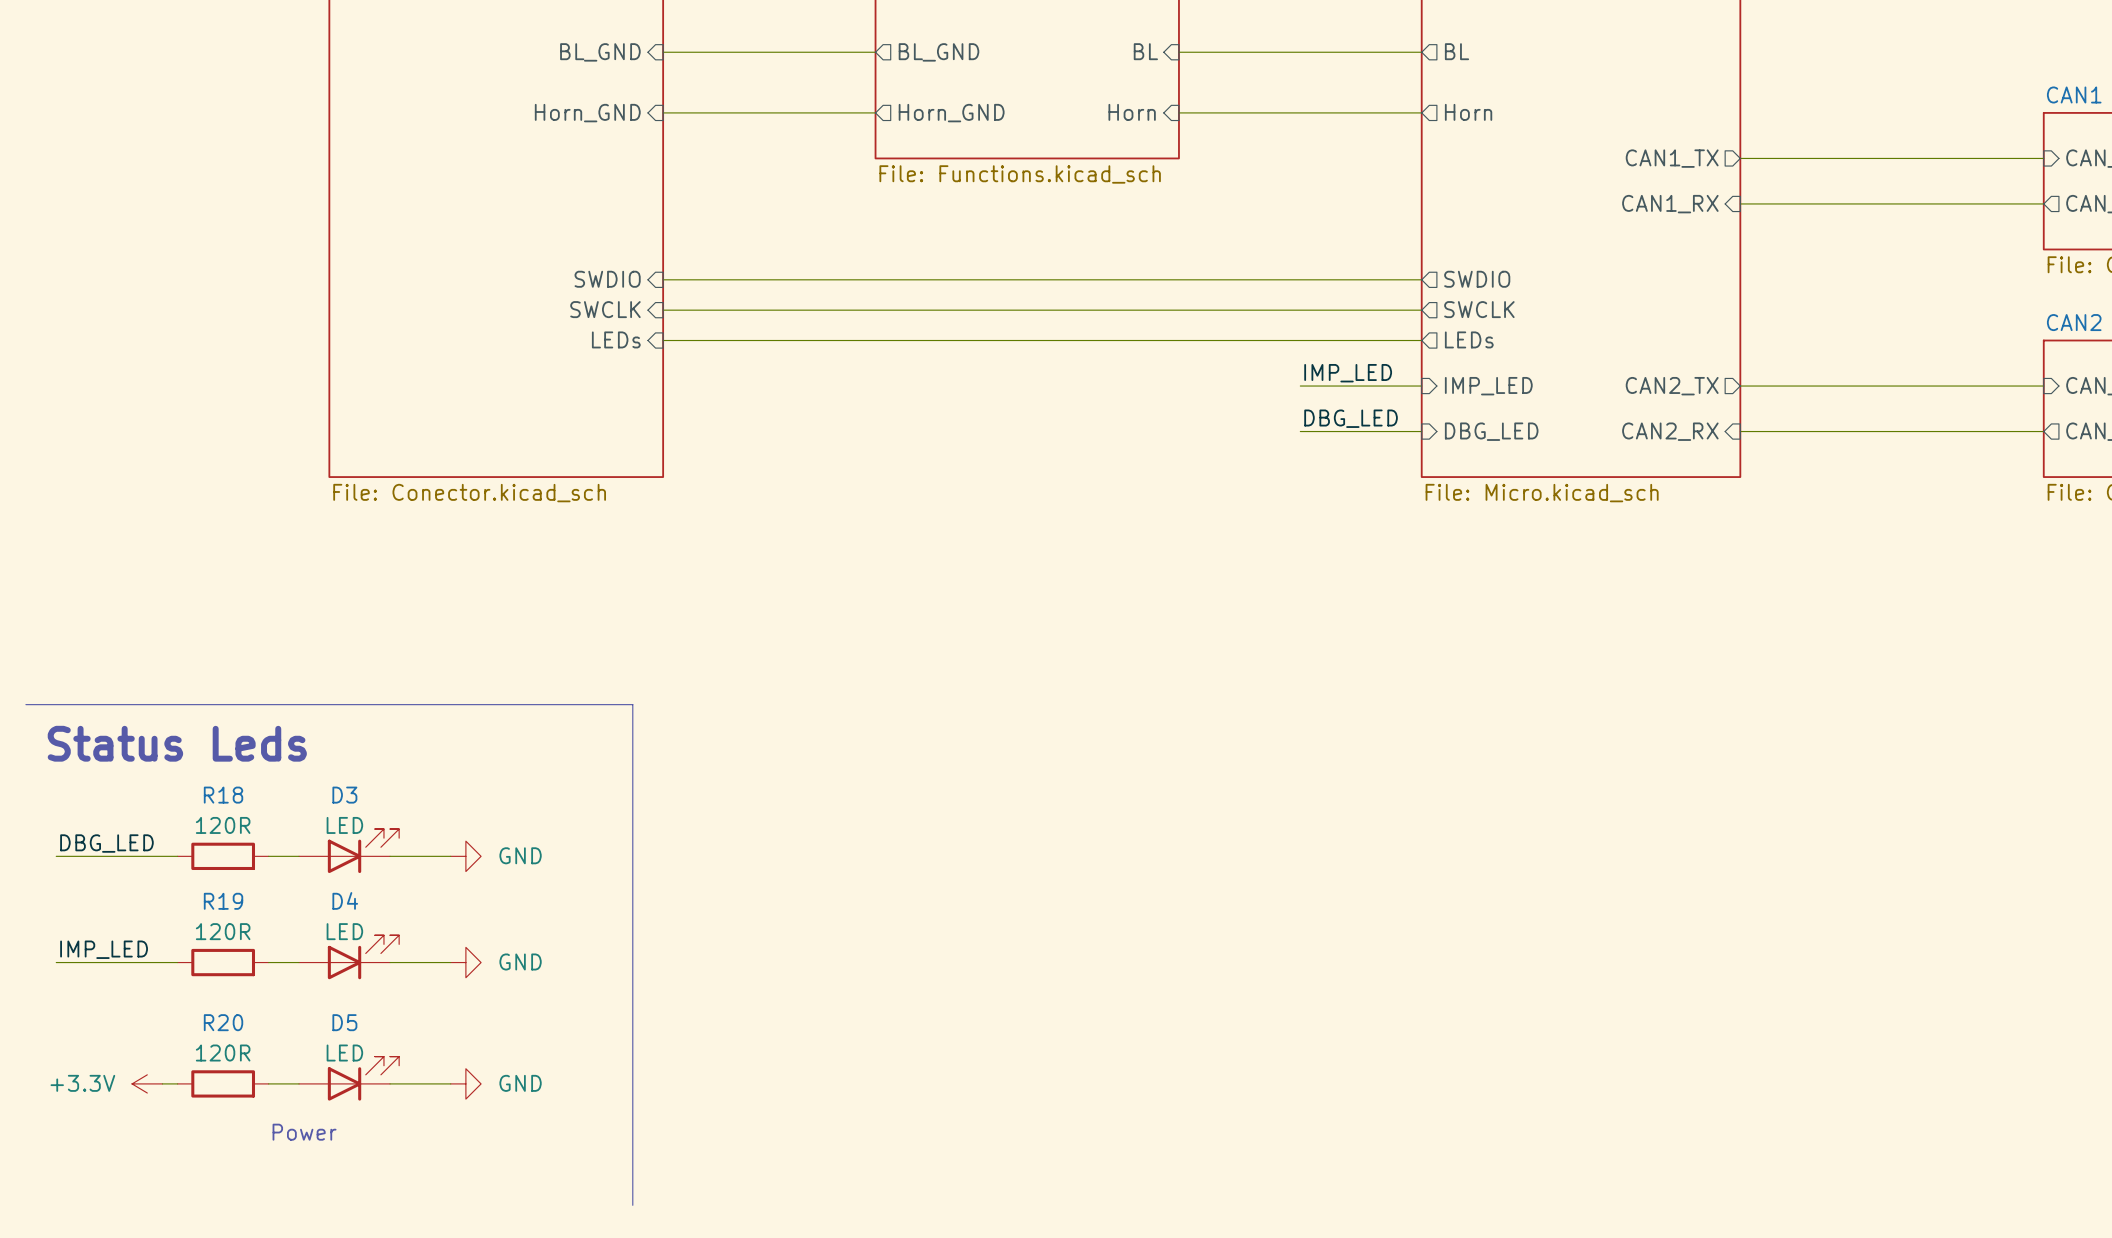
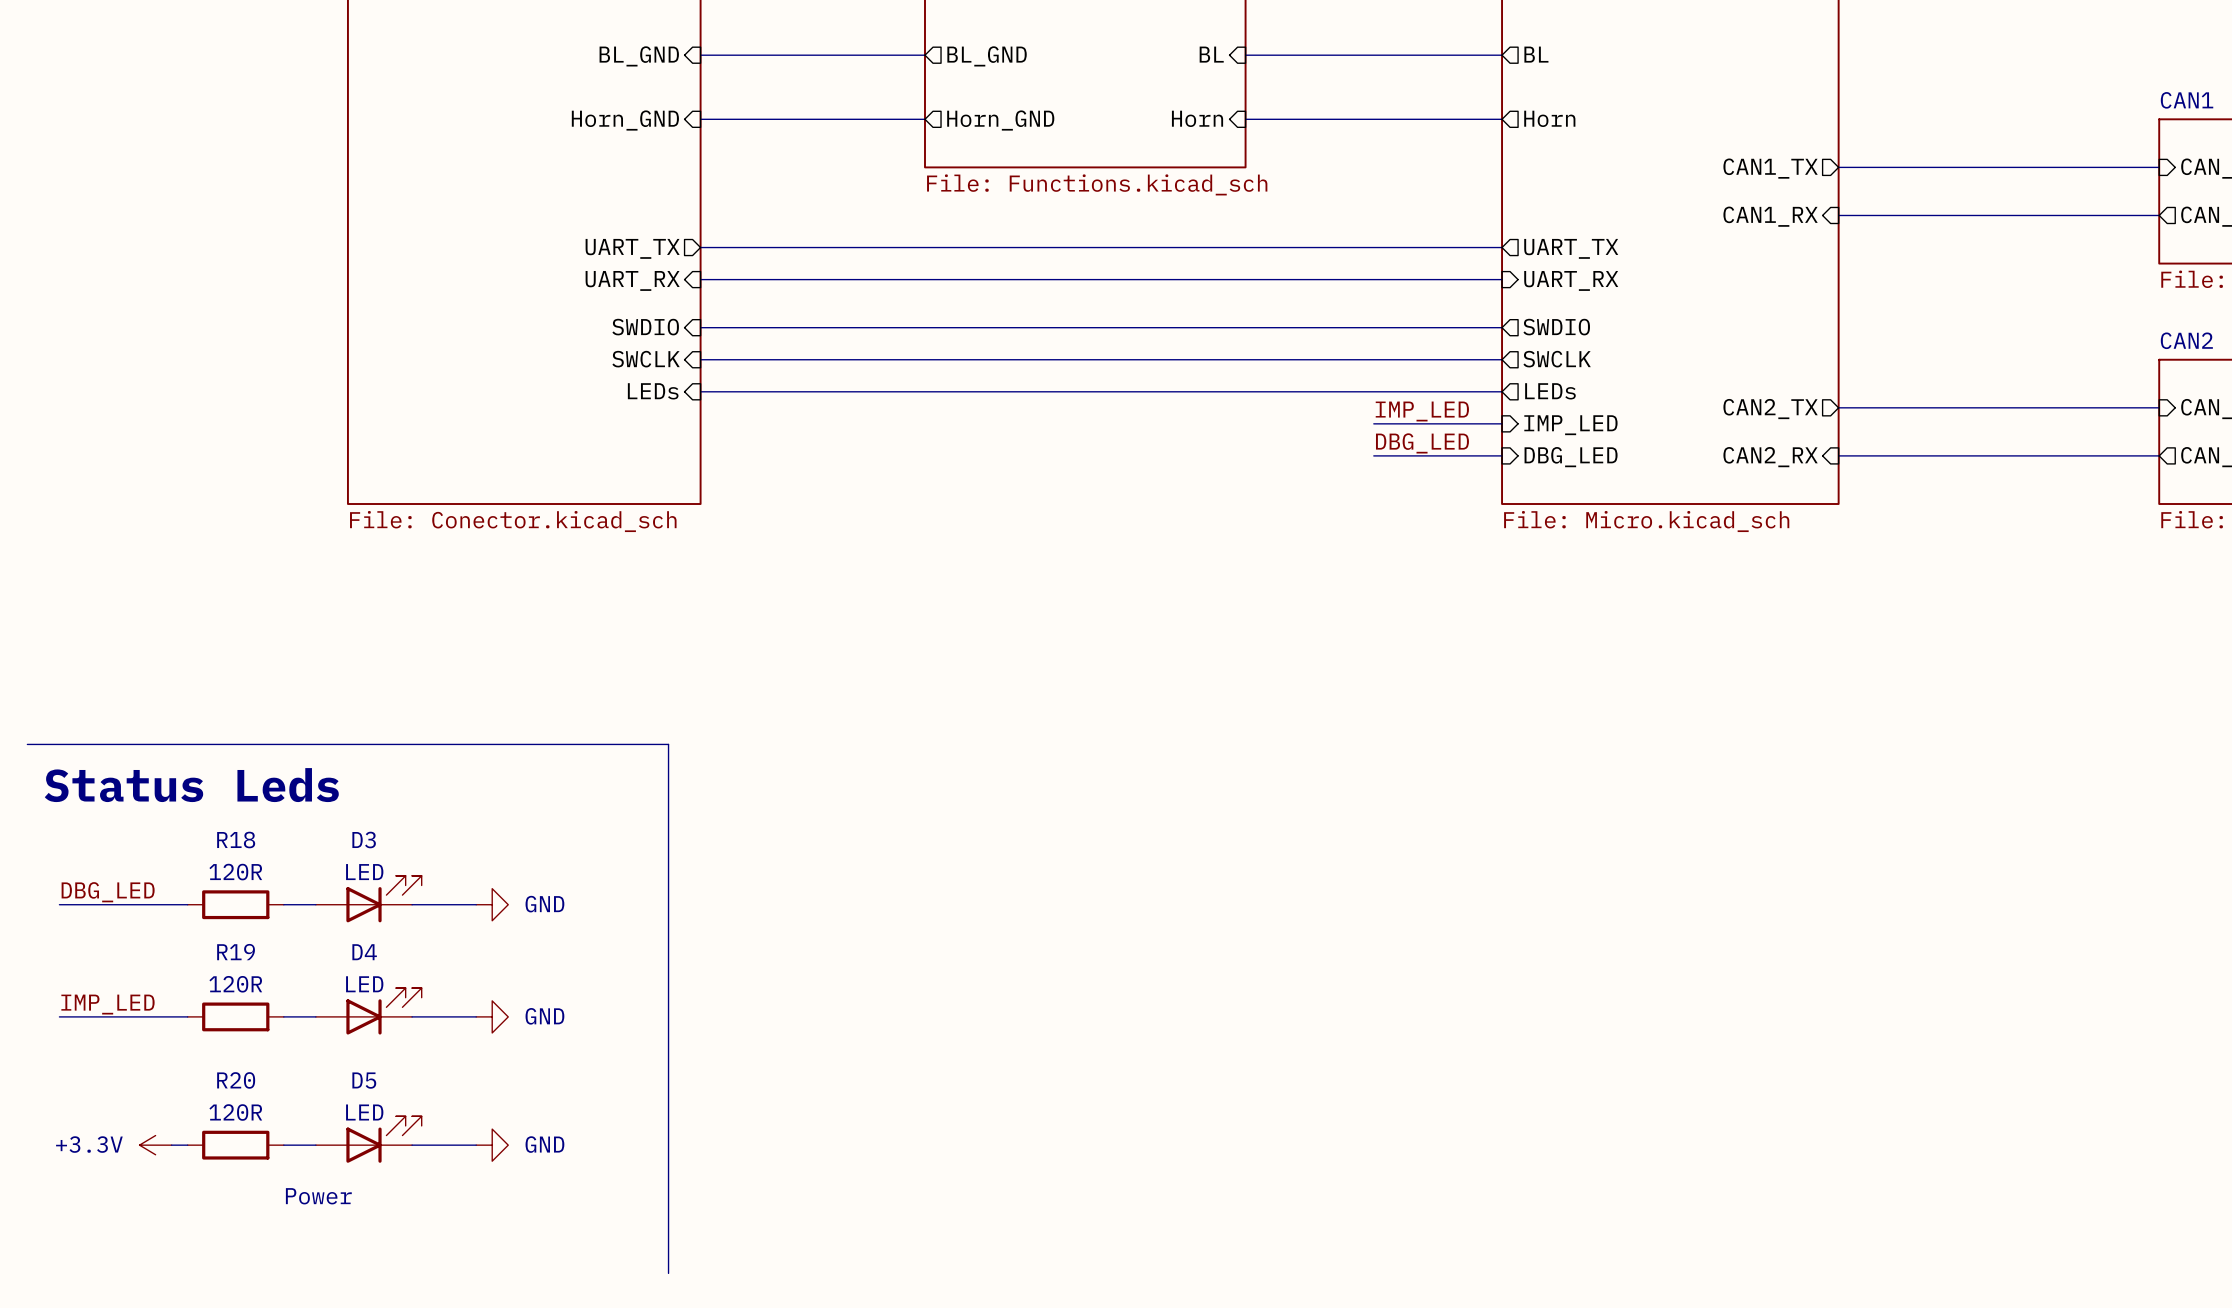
sheet pin: none -> UART_TX (632, 248)
wire: none -> (700, 247) (1502, 247)
sheet pin: none -> UART_TX (1571, 248)
sheet pin: none -> UART_RX (632, 280)
sheet pin: none -> UART_RX (1571, 280)
sheet pin: SWDIO (607, 279) -> none
wire: (663, 279) (1421, 279) -> (700, 279) (1502, 279)
sheet pin: SWDIO (1477, 279) -> none
sheet pin: SWCLK (605, 309) -> SWDIO (645, 327)
sheet pin: SWCLK (1479, 309) -> SWDIO (1556, 327)
sheet pin: LEDs (616, 339) -> SWCLK (646, 359)
sheet pin: LEDs (1469, 339) -> SWCLK (1557, 359)
sheet pin: none -> LEDs (653, 391)
wire: none -> (700, 391) (1502, 391)
sheet pin: none -> LEDs (1550, 391)
label position: IMP_LED (1348, 373) -> IMP_LED (1422, 411)
wire: (1300, 386) (1421, 386) -> (1373, 423) (1502, 423)
sheet pin position: IMP_LED (1488, 386) -> IMP_LED (1570, 425)

